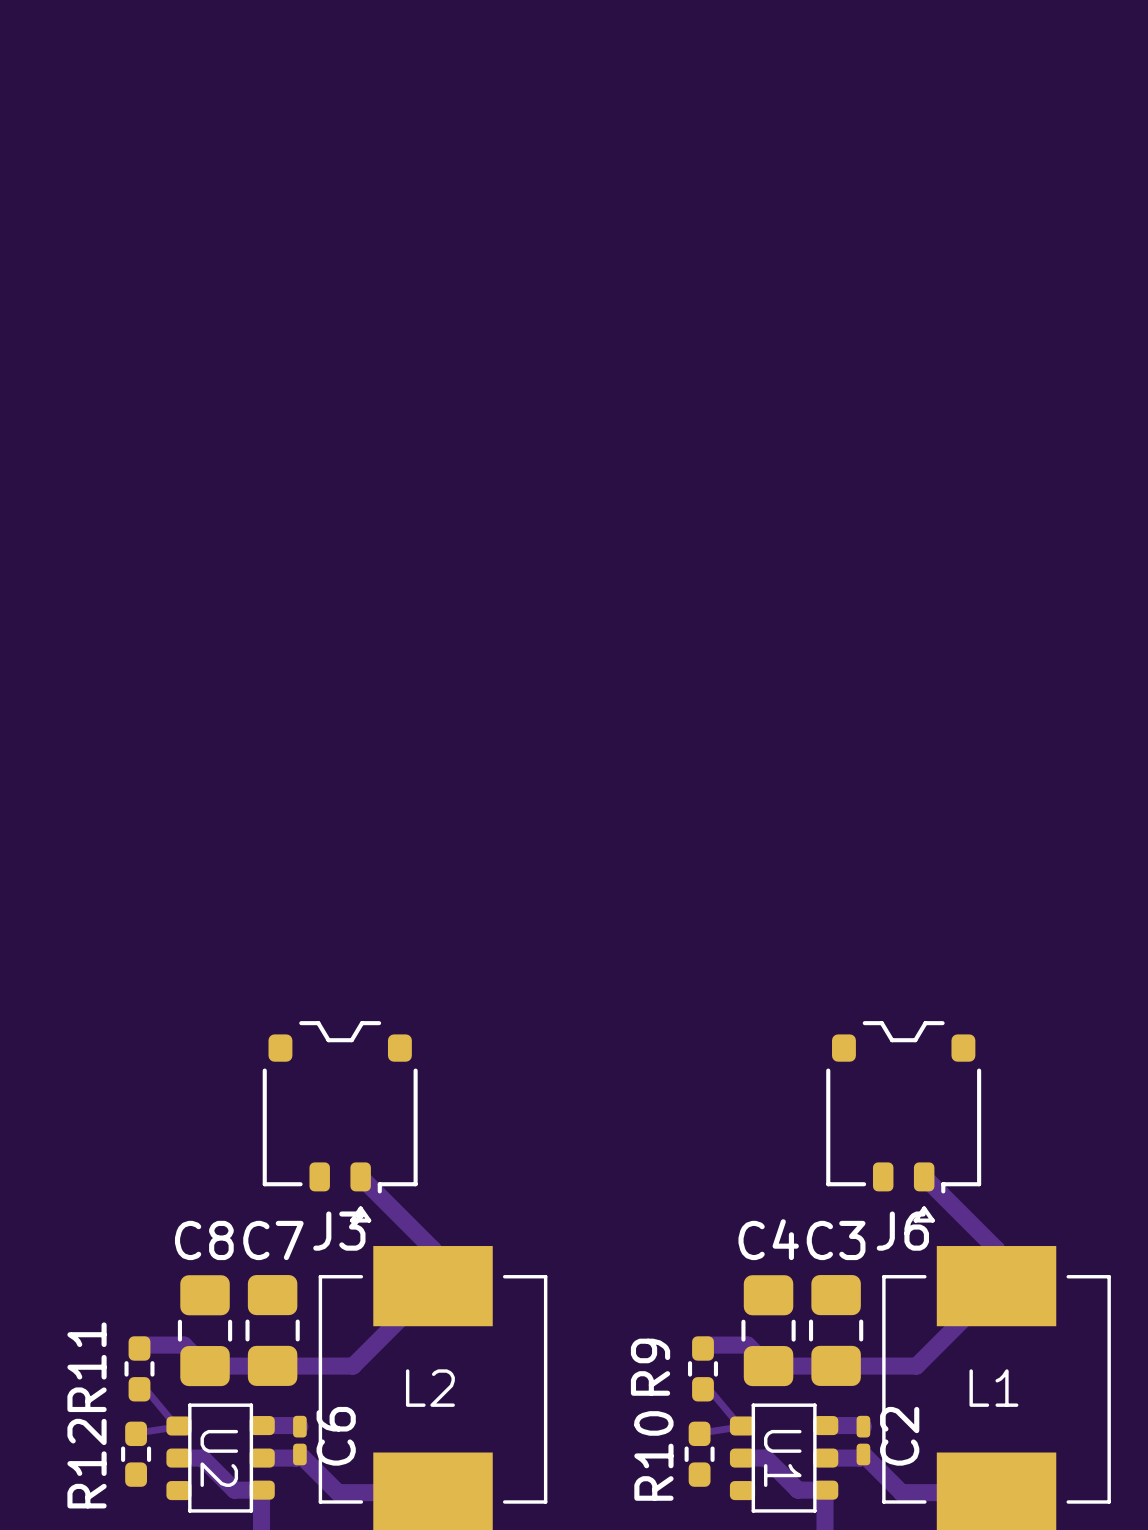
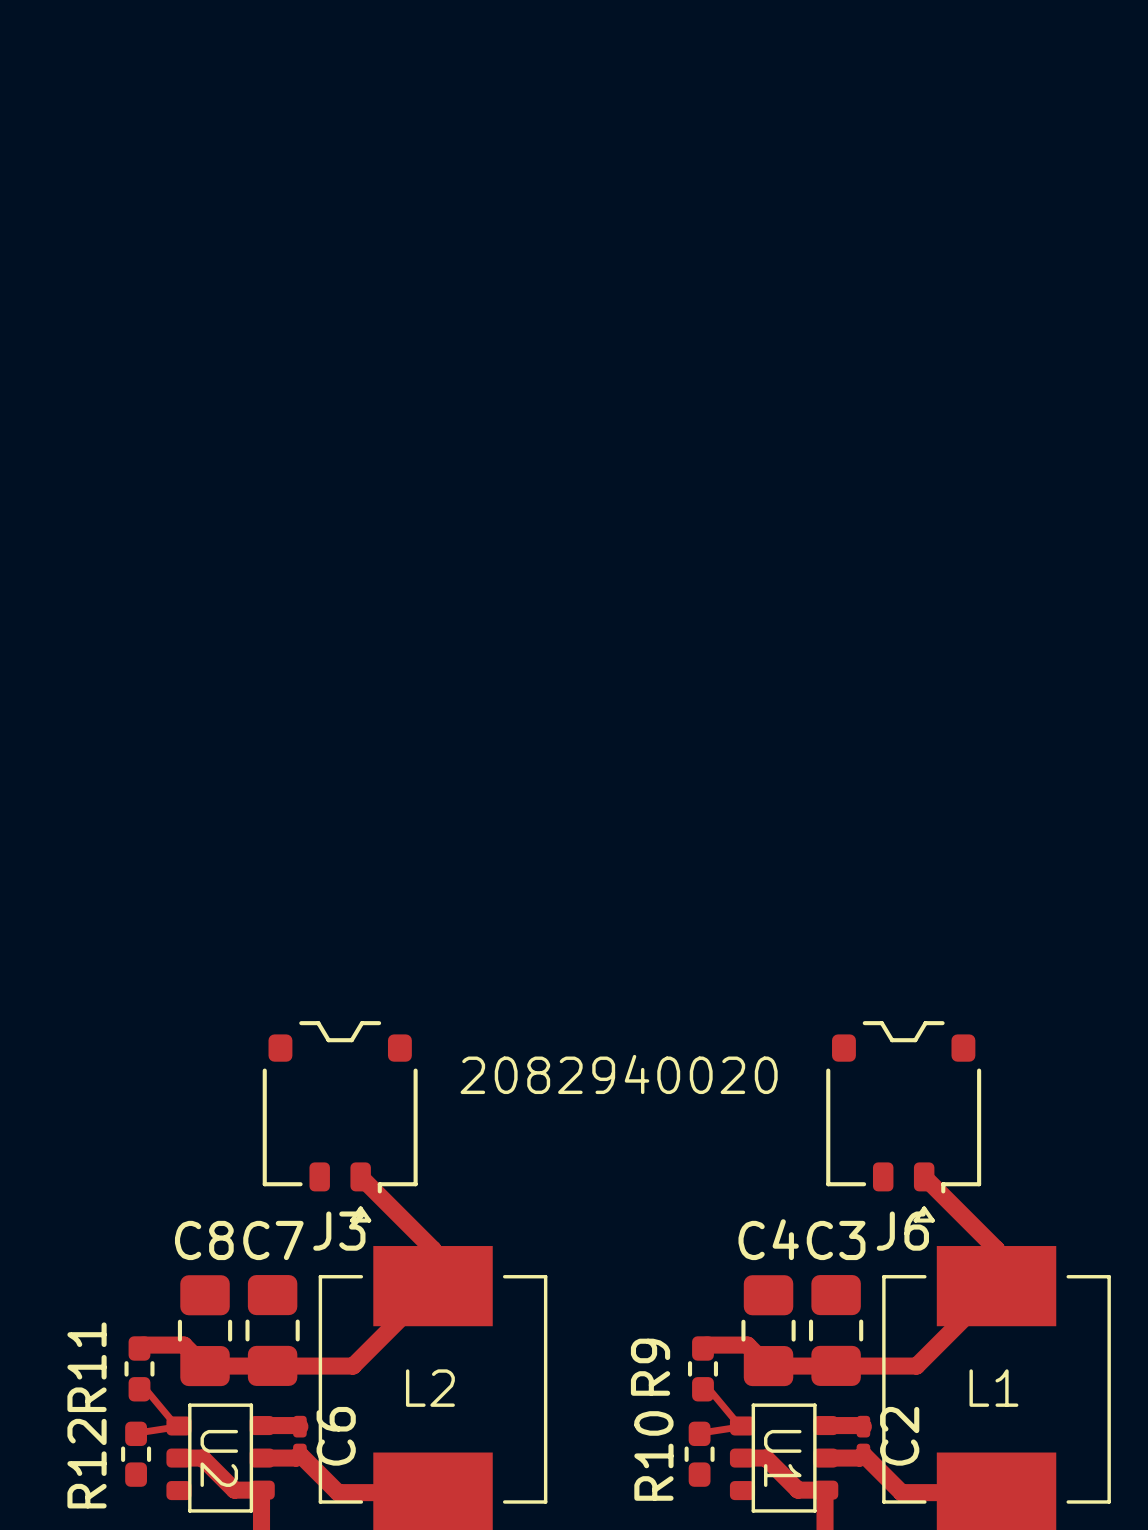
text: none -> 2082940020 (619, 1074)

